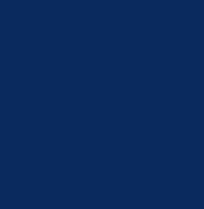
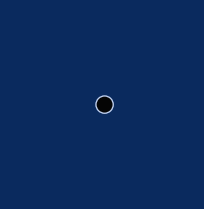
part: none -> (104, 104)

